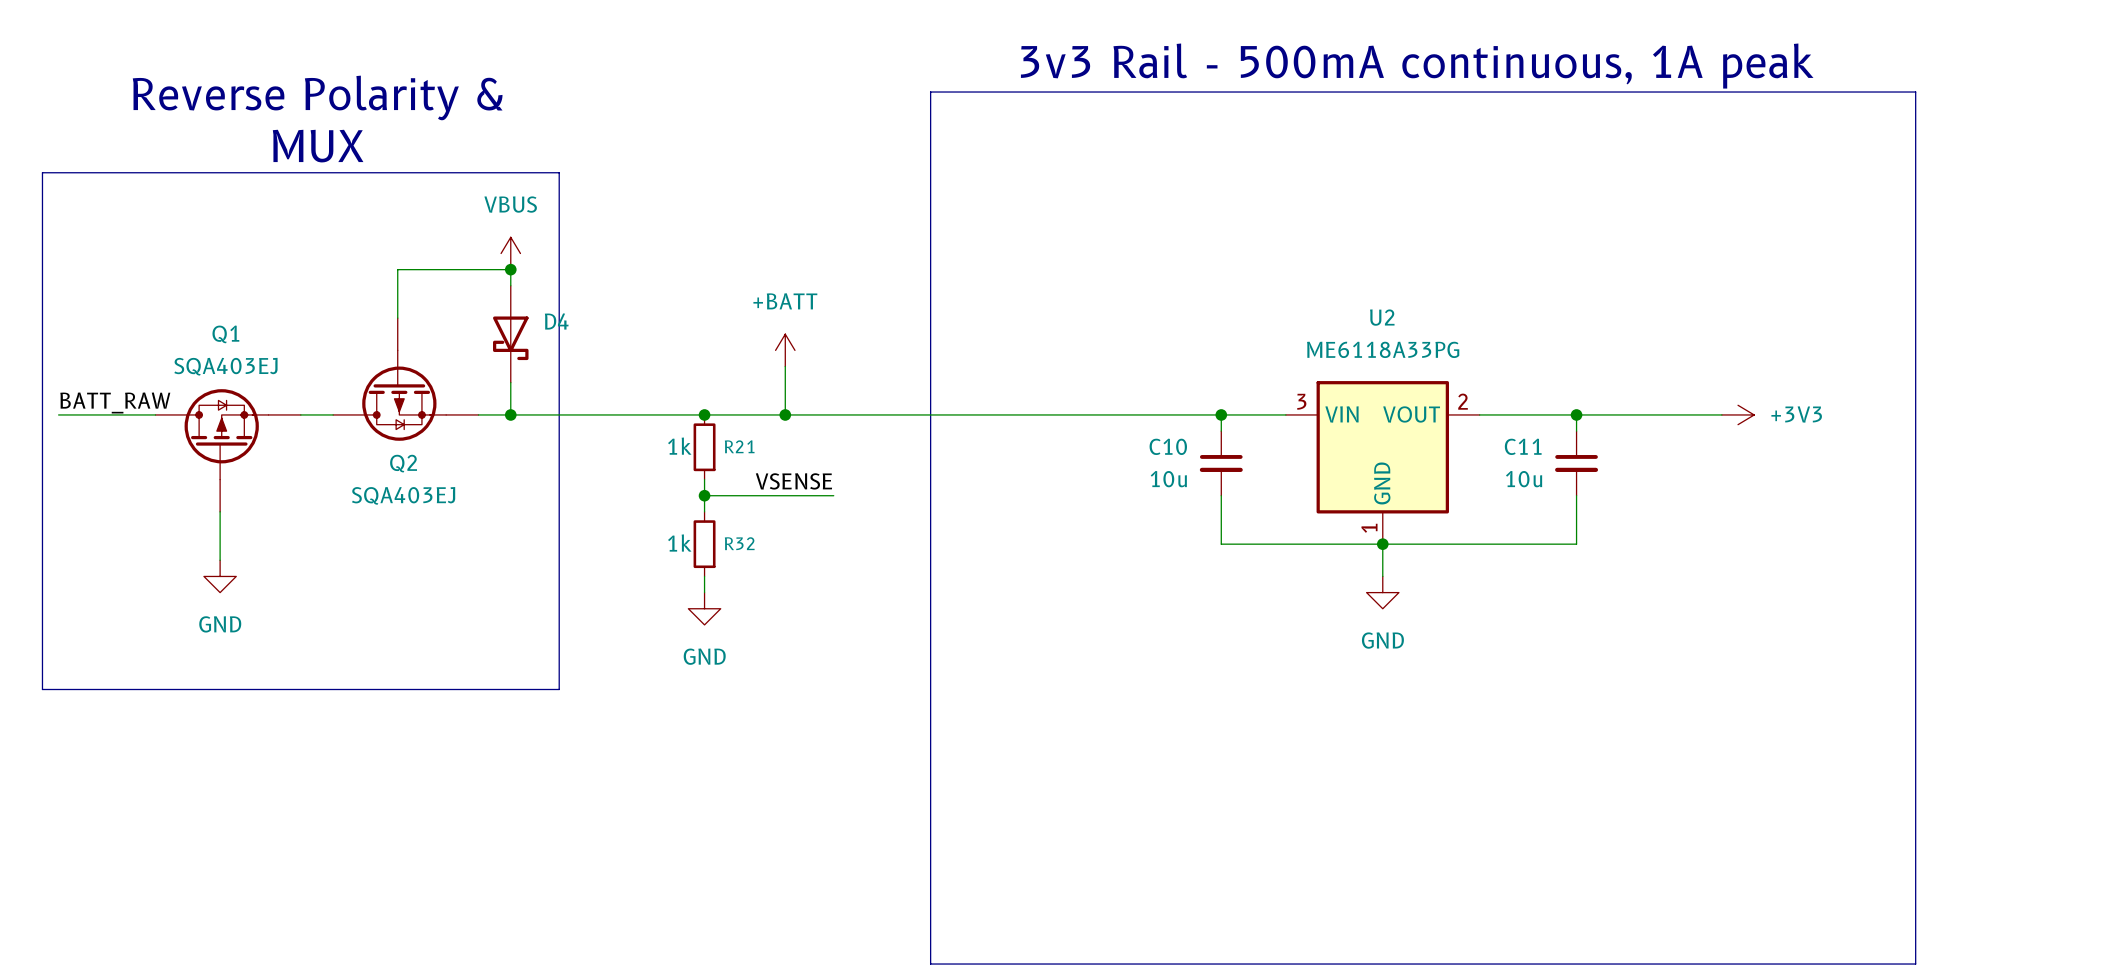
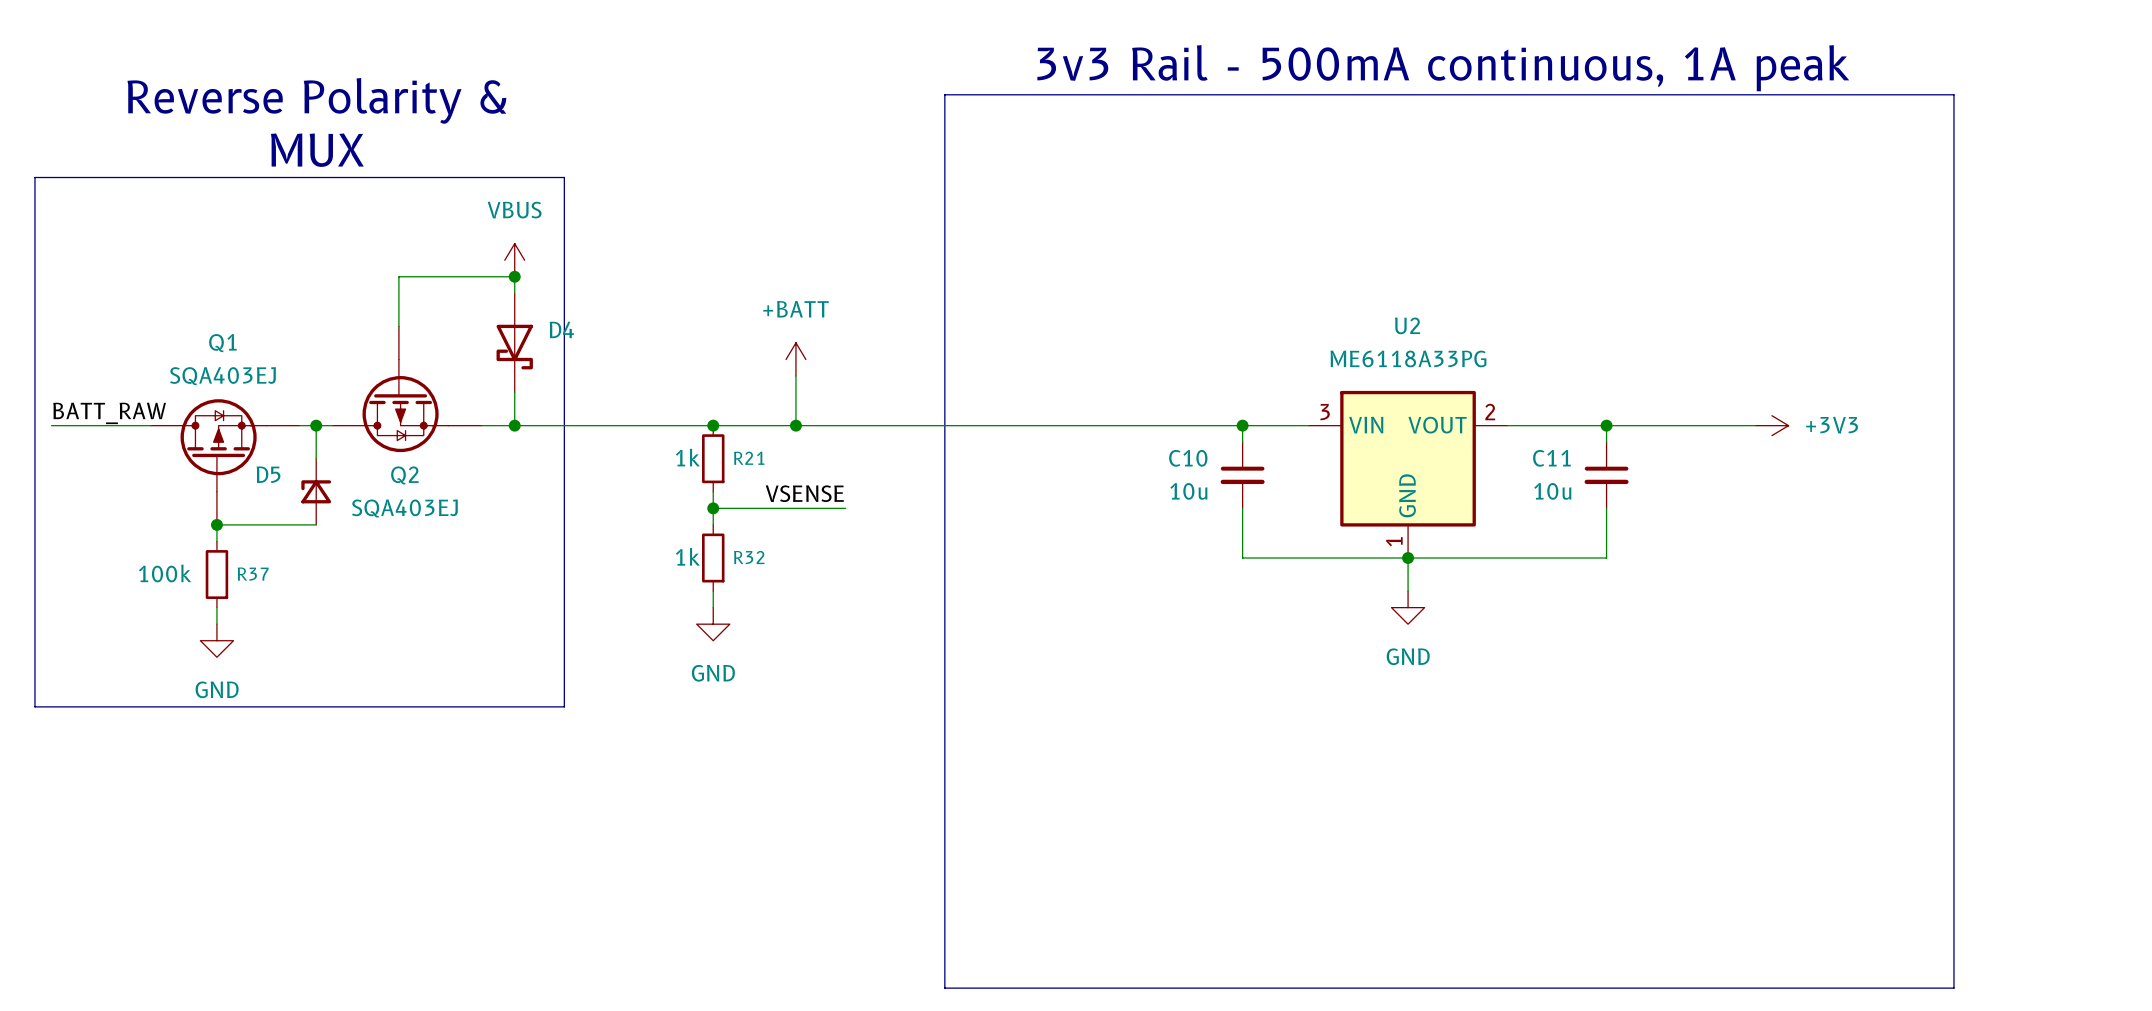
junction: none -> (316, 425)
D5: none -> (316, 491)
wire: none -> (216, 524) (316, 524)
junction: none -> (216, 524)
wire: (220, 528) (220, 560) -> (316, 425) (316, 458)
R37: none -> 100k (216, 574)
power symbol position: GND (220, 576) -> GND (216, 640)
wire: none -> (216, 607) (216, 624)

